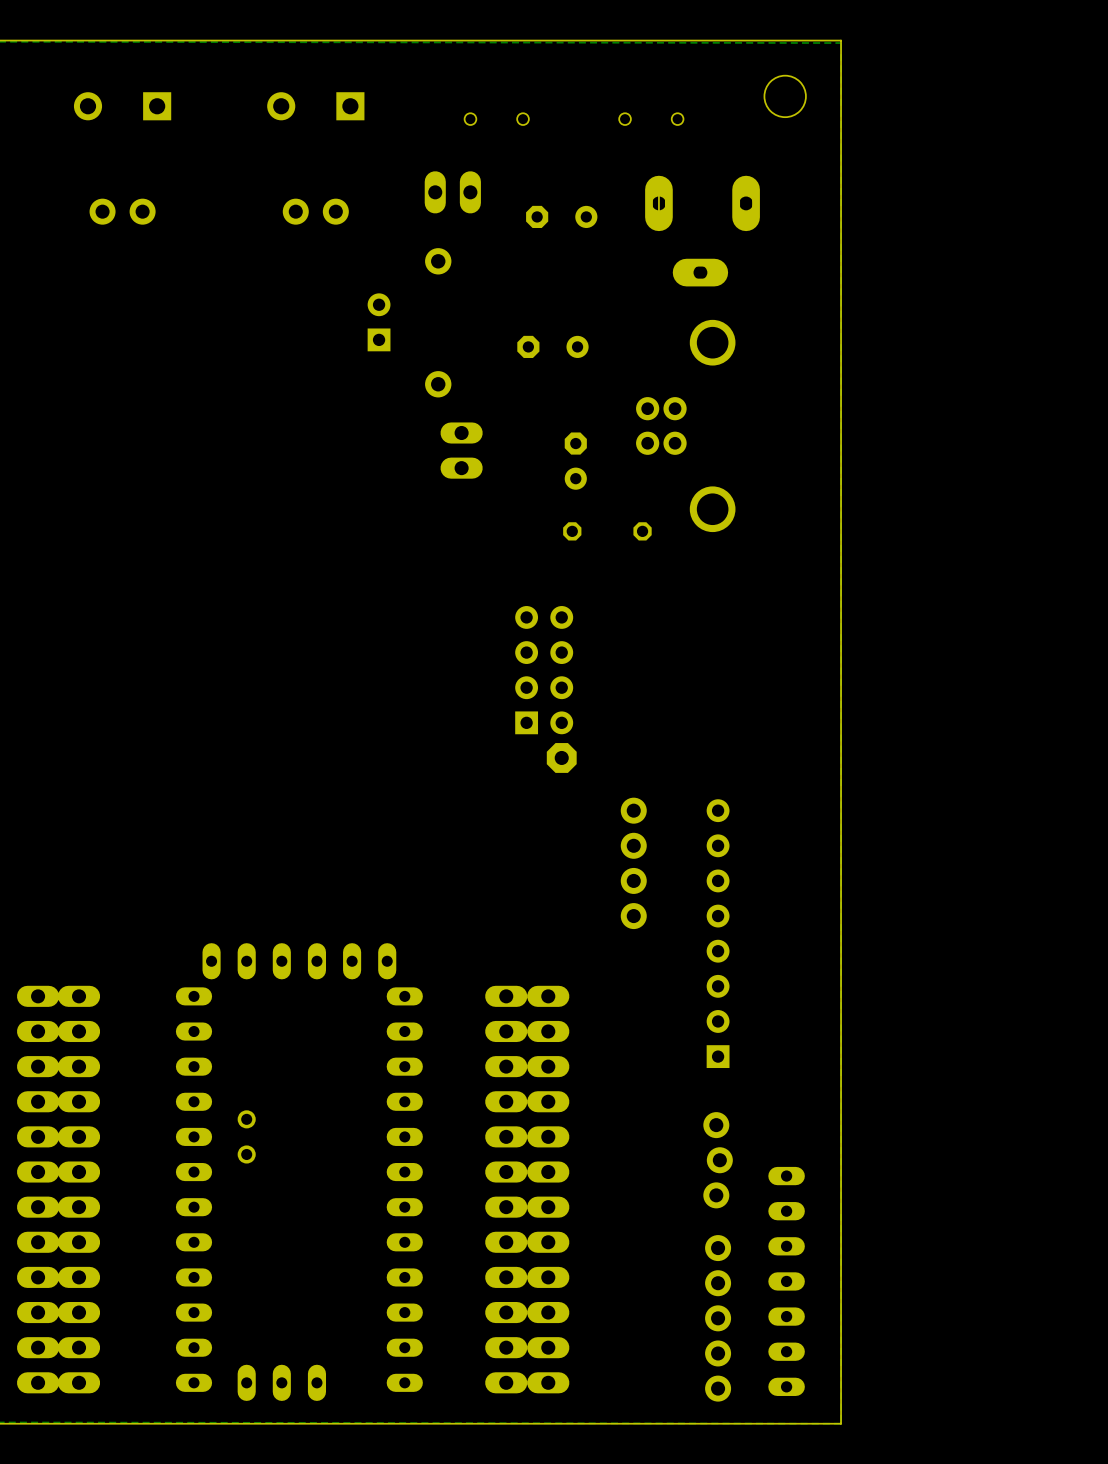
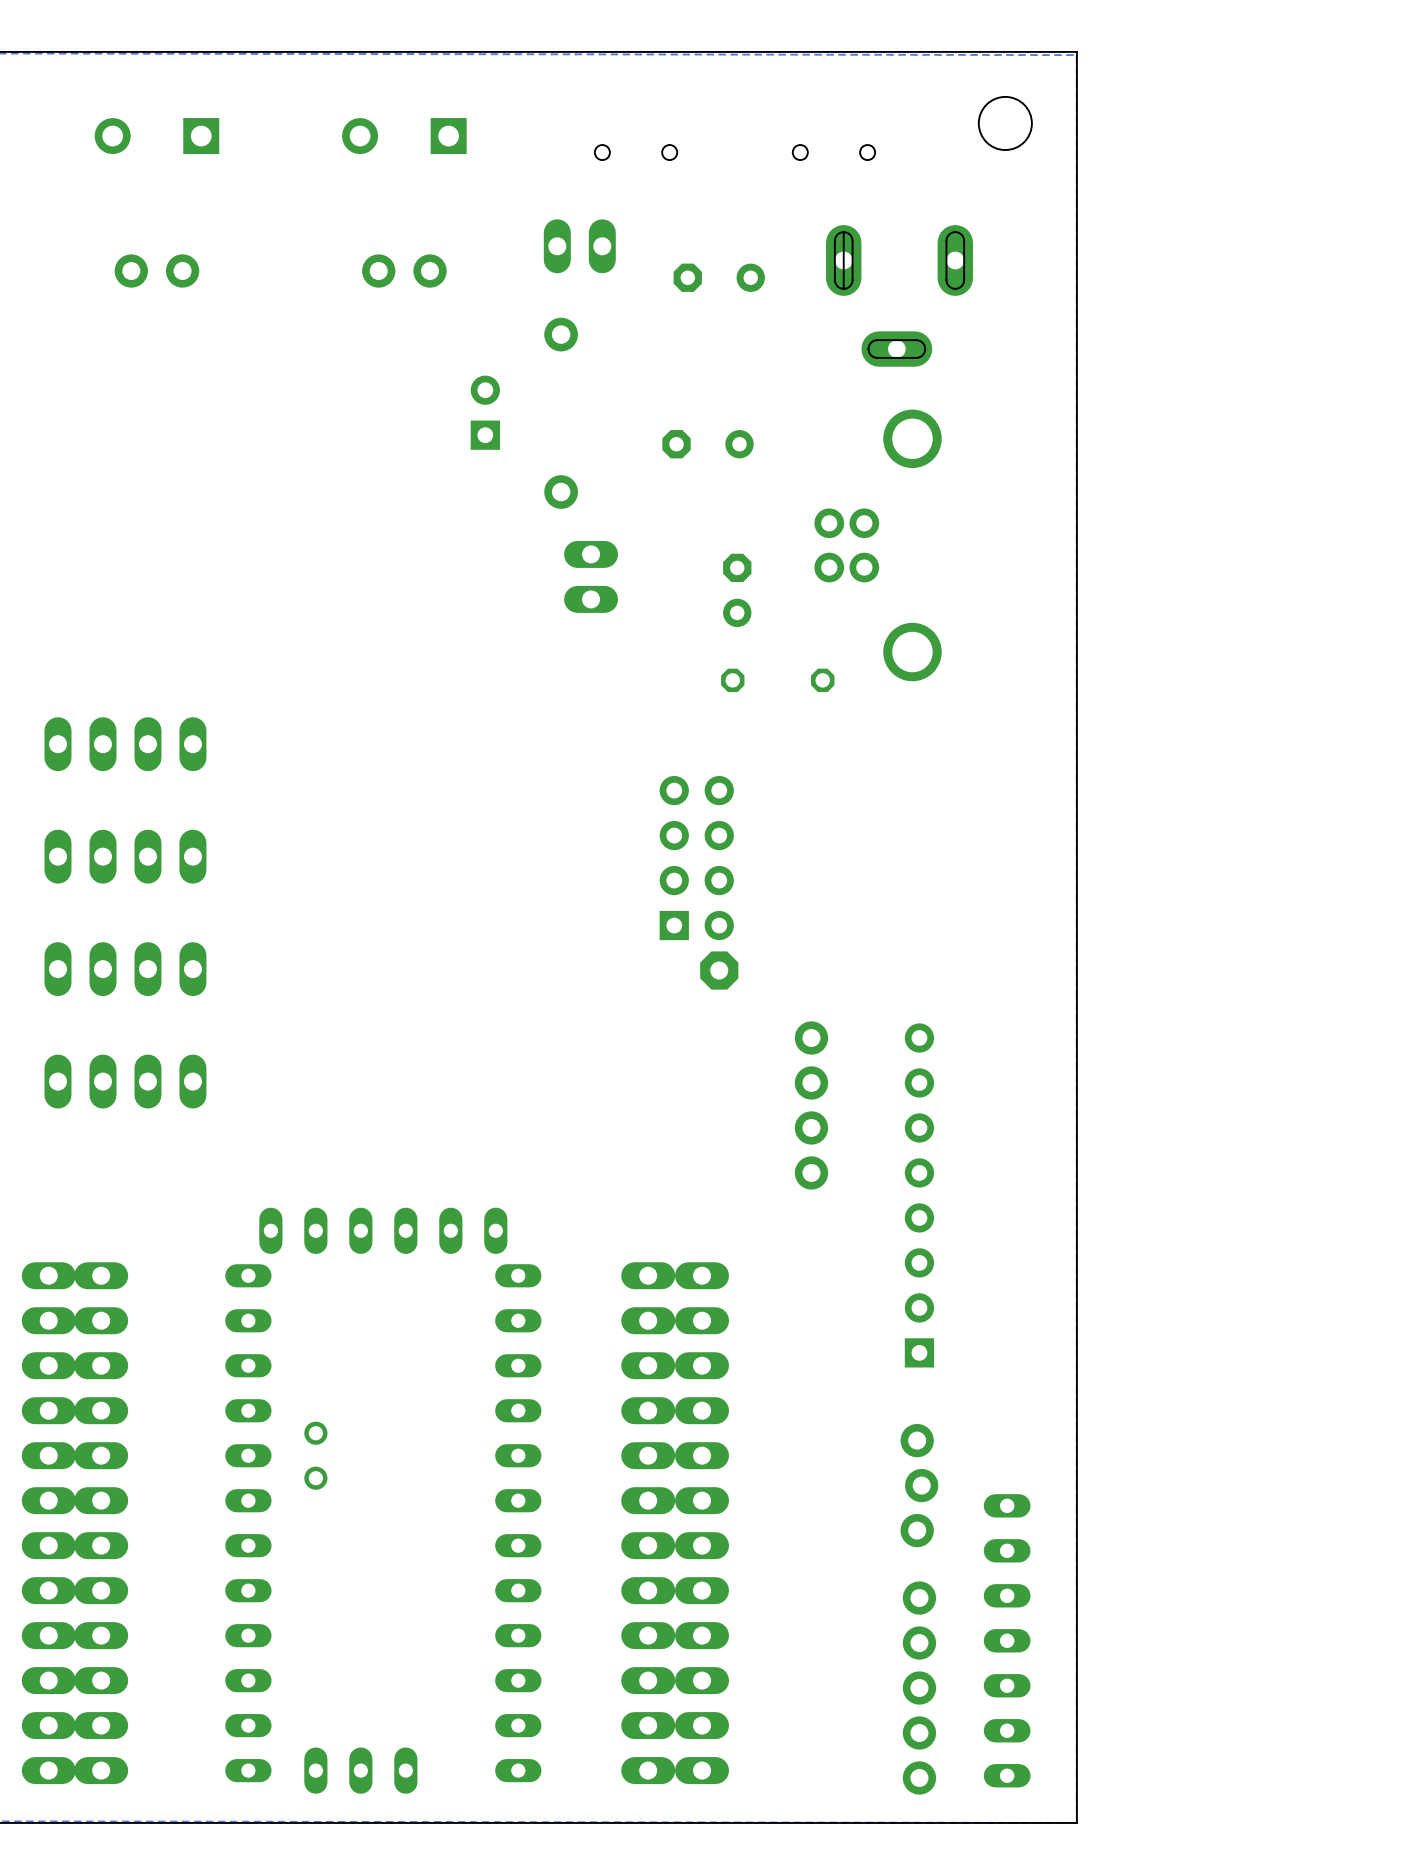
part: none -> (125, 744)
part: none -> (125, 856)
part: none -> (125, 969)
part: none -> (125, 1081)

